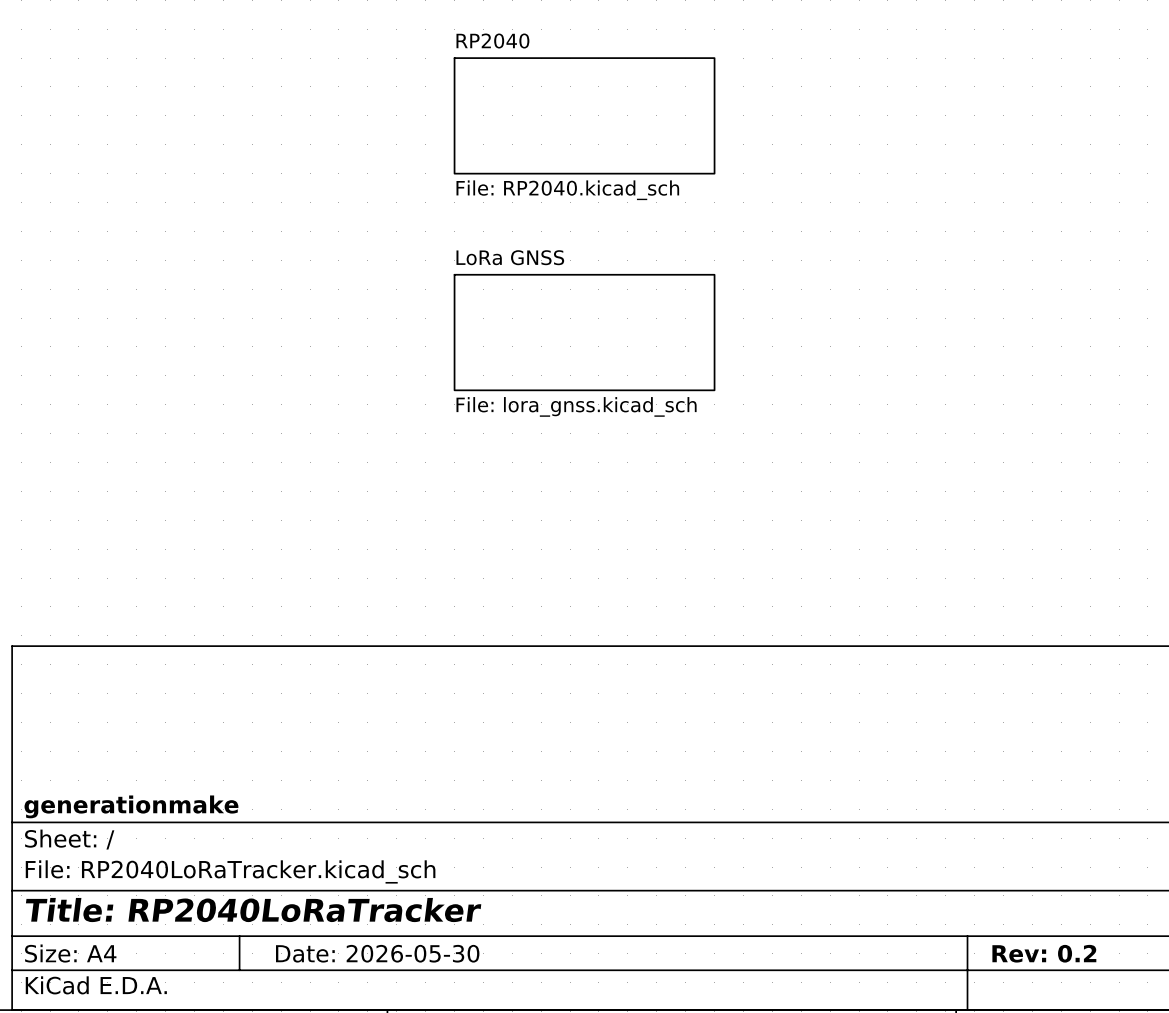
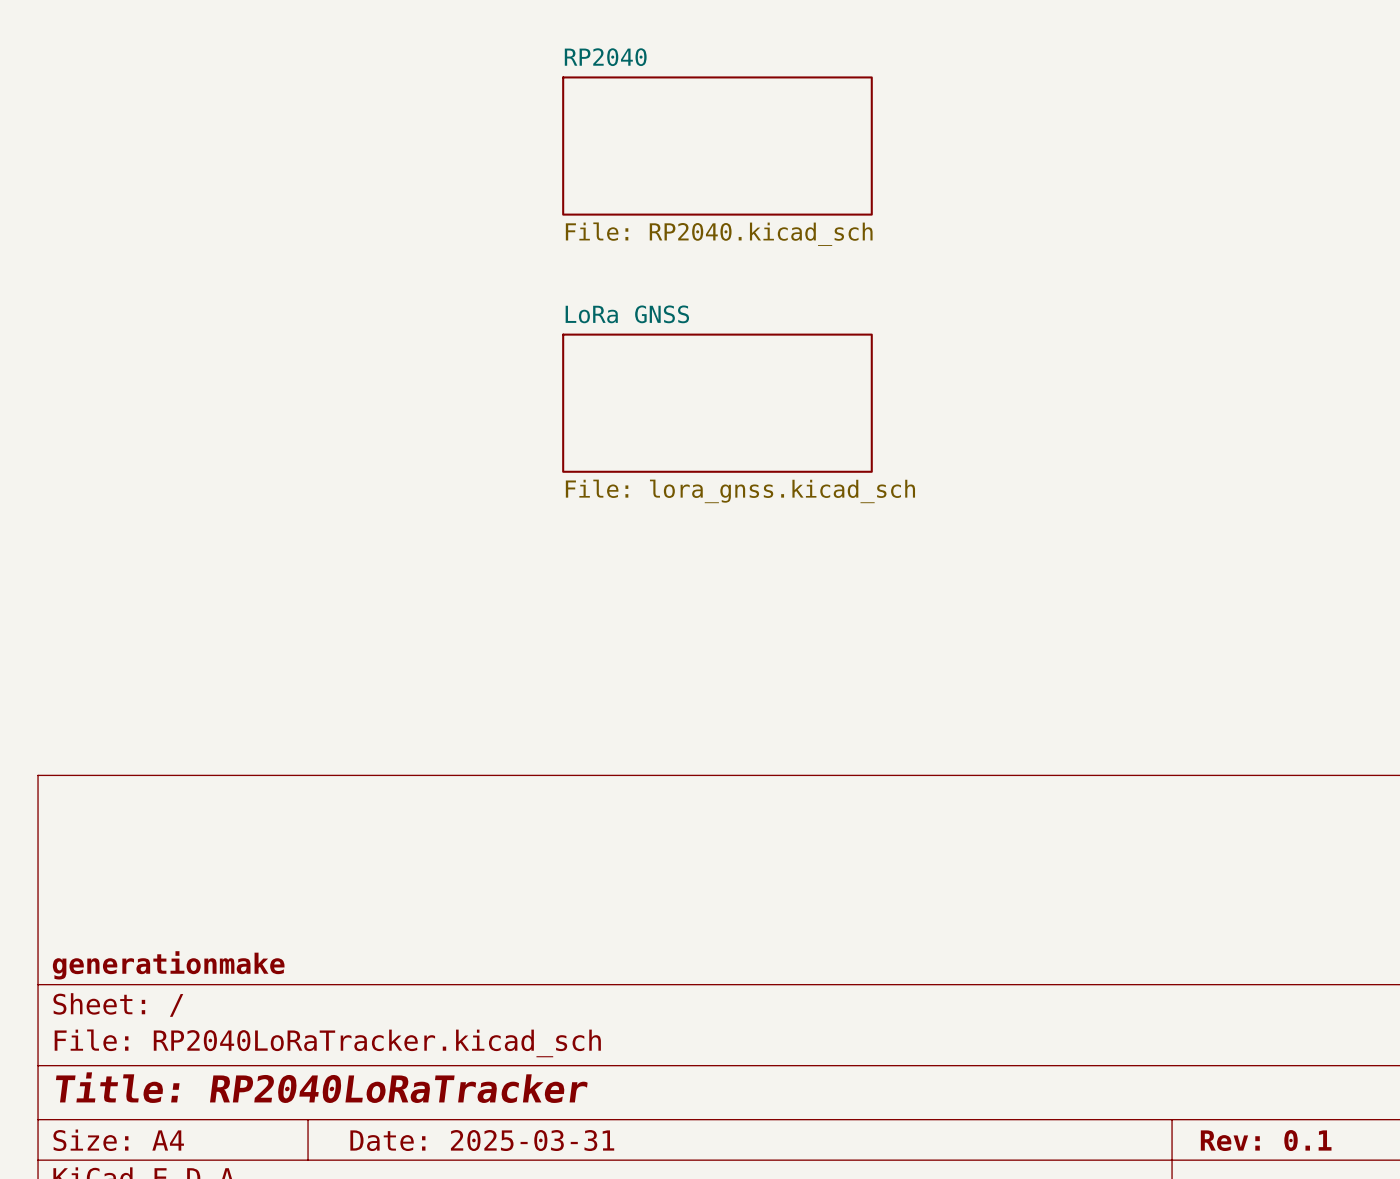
title block: Date: 2026-05-30 (377, 953) -> Date: 2025-03-31 (482, 1140)
title block: Rev: 0.2 (1044, 953) -> Rev: 0.1 (1266, 1140)

